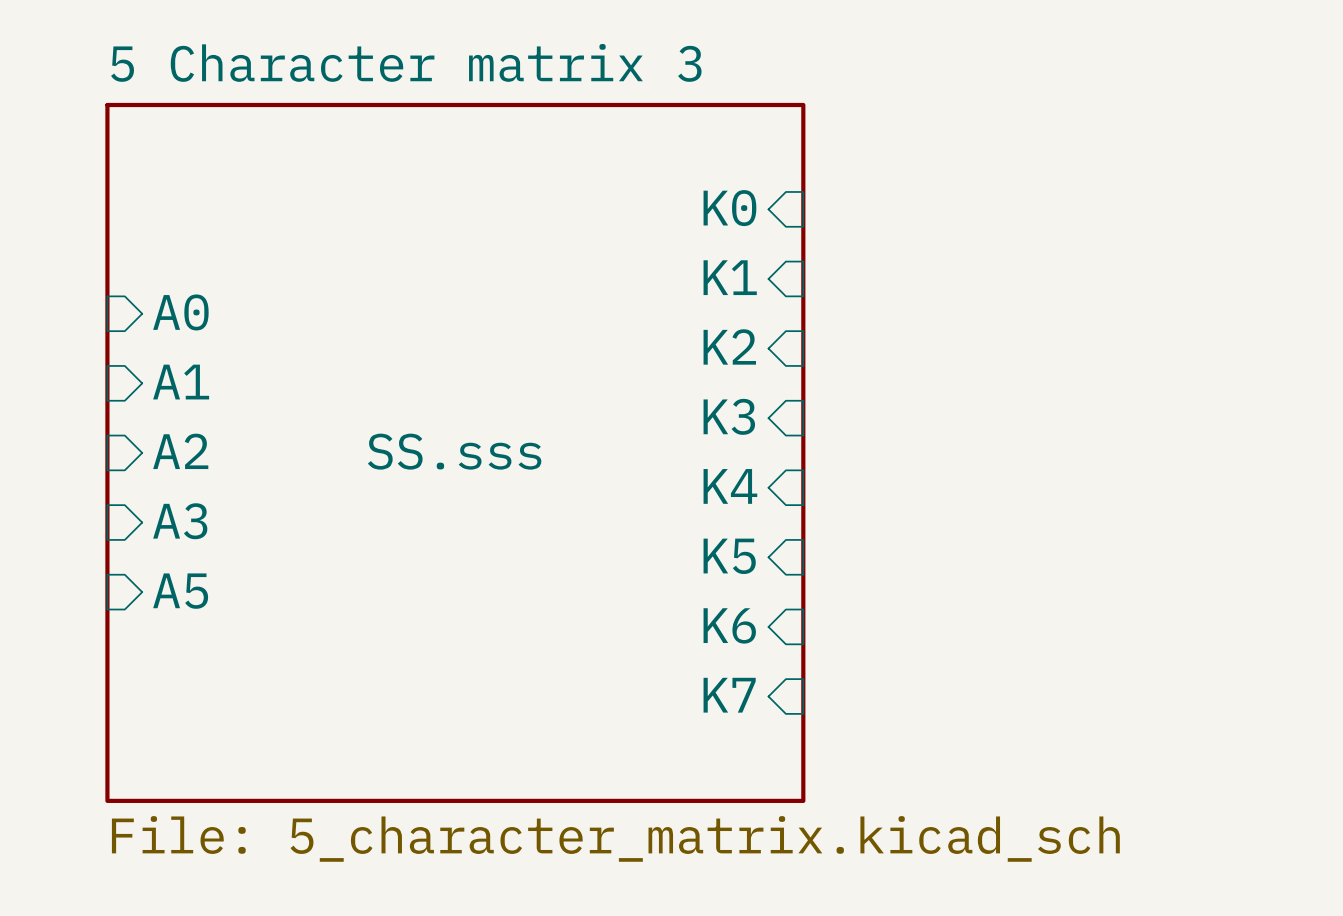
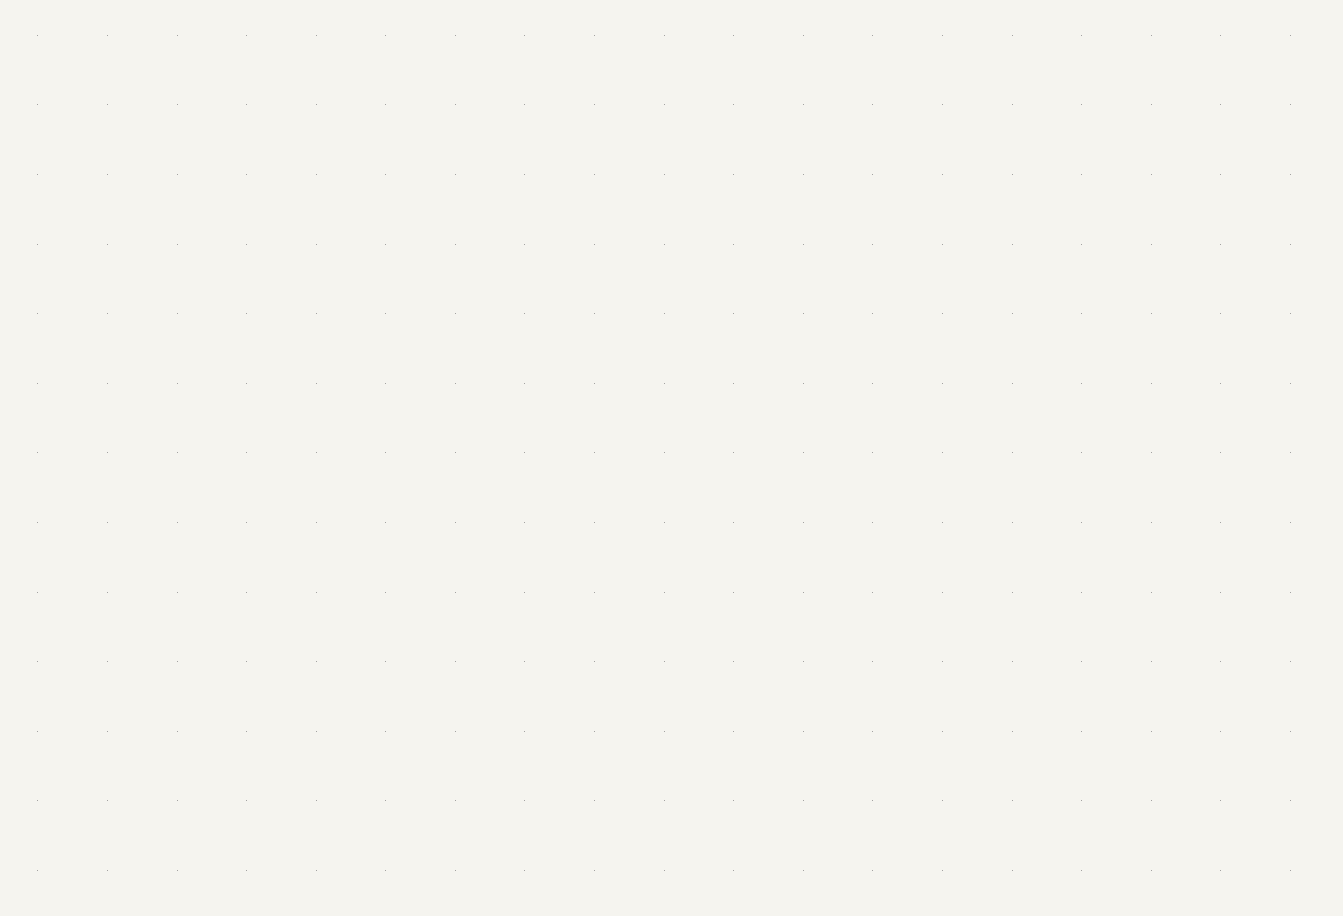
sheet pin: K0 (729, 208) -> none
sheet pin: K1 (730, 277) -> none
sheet pin: A0 (180, 312) -> none
sheet pin: K2 (729, 346) -> none
sheet pin: A1 (181, 382) -> none
sheet pin: K3 (729, 416) -> none
sheet pin: A2 (180, 451) -> none
sheet 5 Character matrix 3: File: 5_character_matrix.kicad_sch (455, 452) -> none
sheet pin: K4 (730, 486) -> none
sheet pin: A3 (180, 521) -> none
sheet pin: K5 (729, 556) -> none
sheet pin: A5 (180, 591) -> none
sheet pin: K6 (729, 625) -> none
sheet pin: K7 (729, 695) -> none

